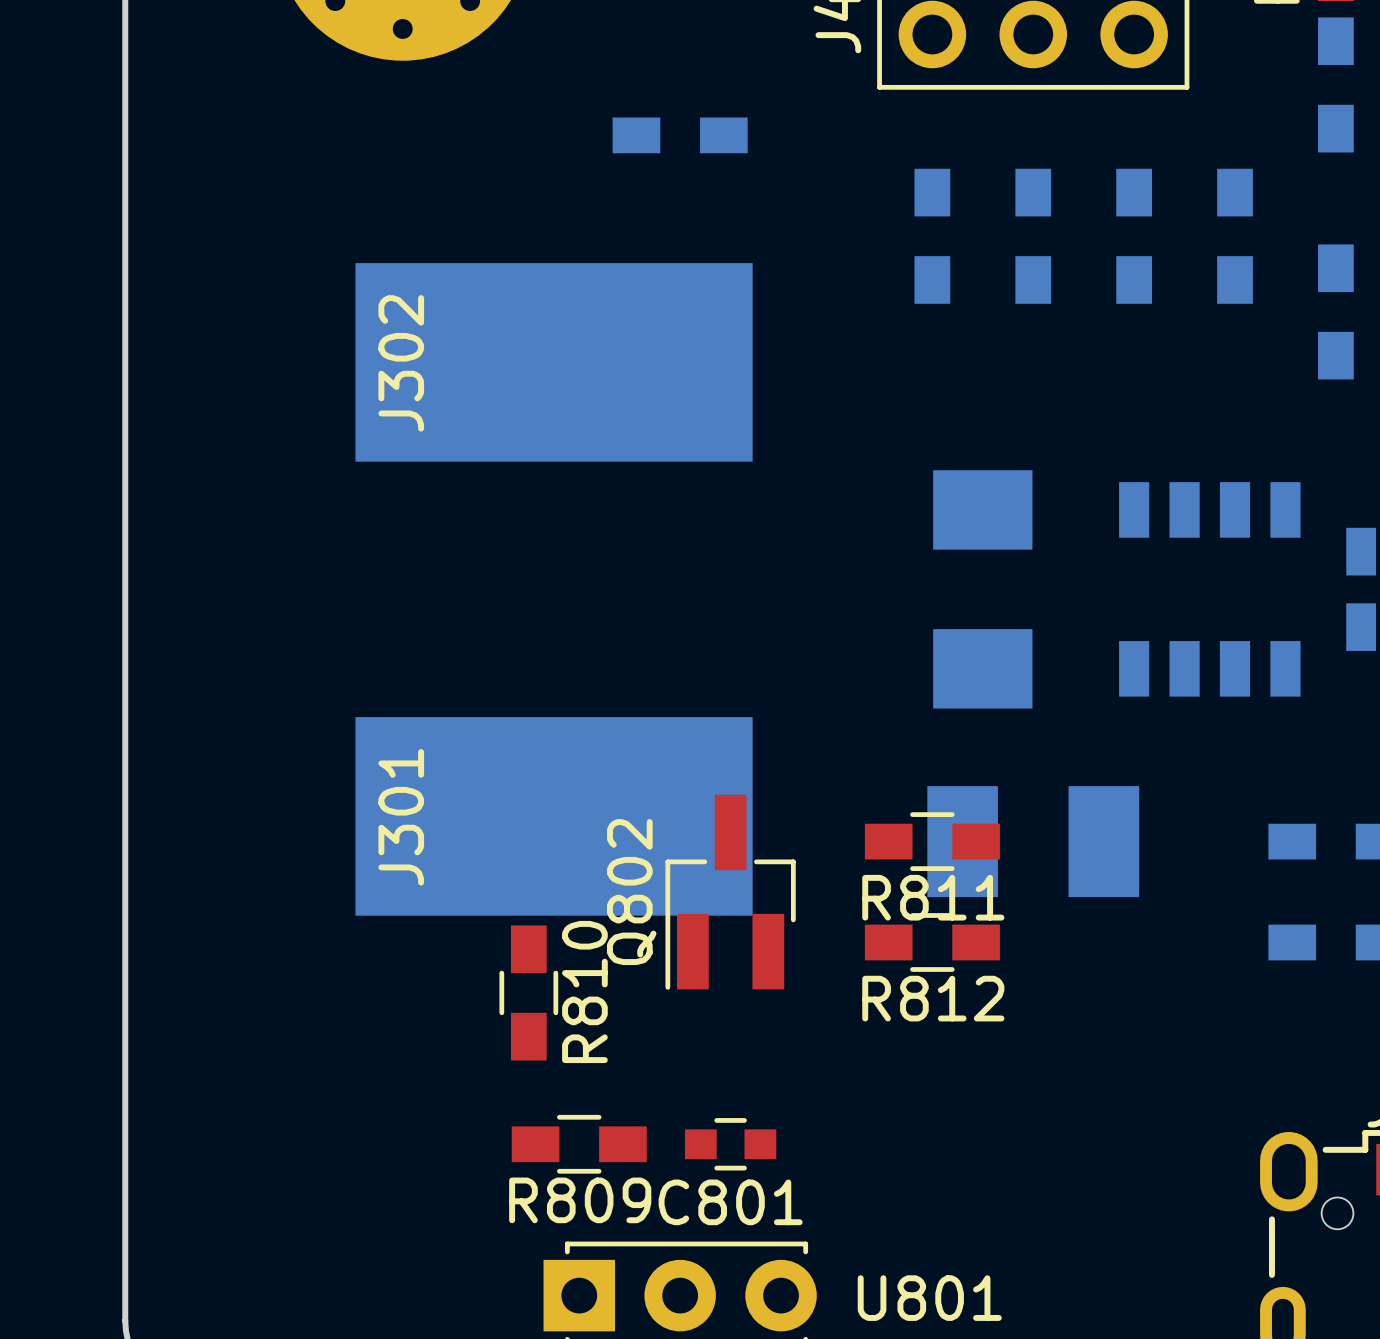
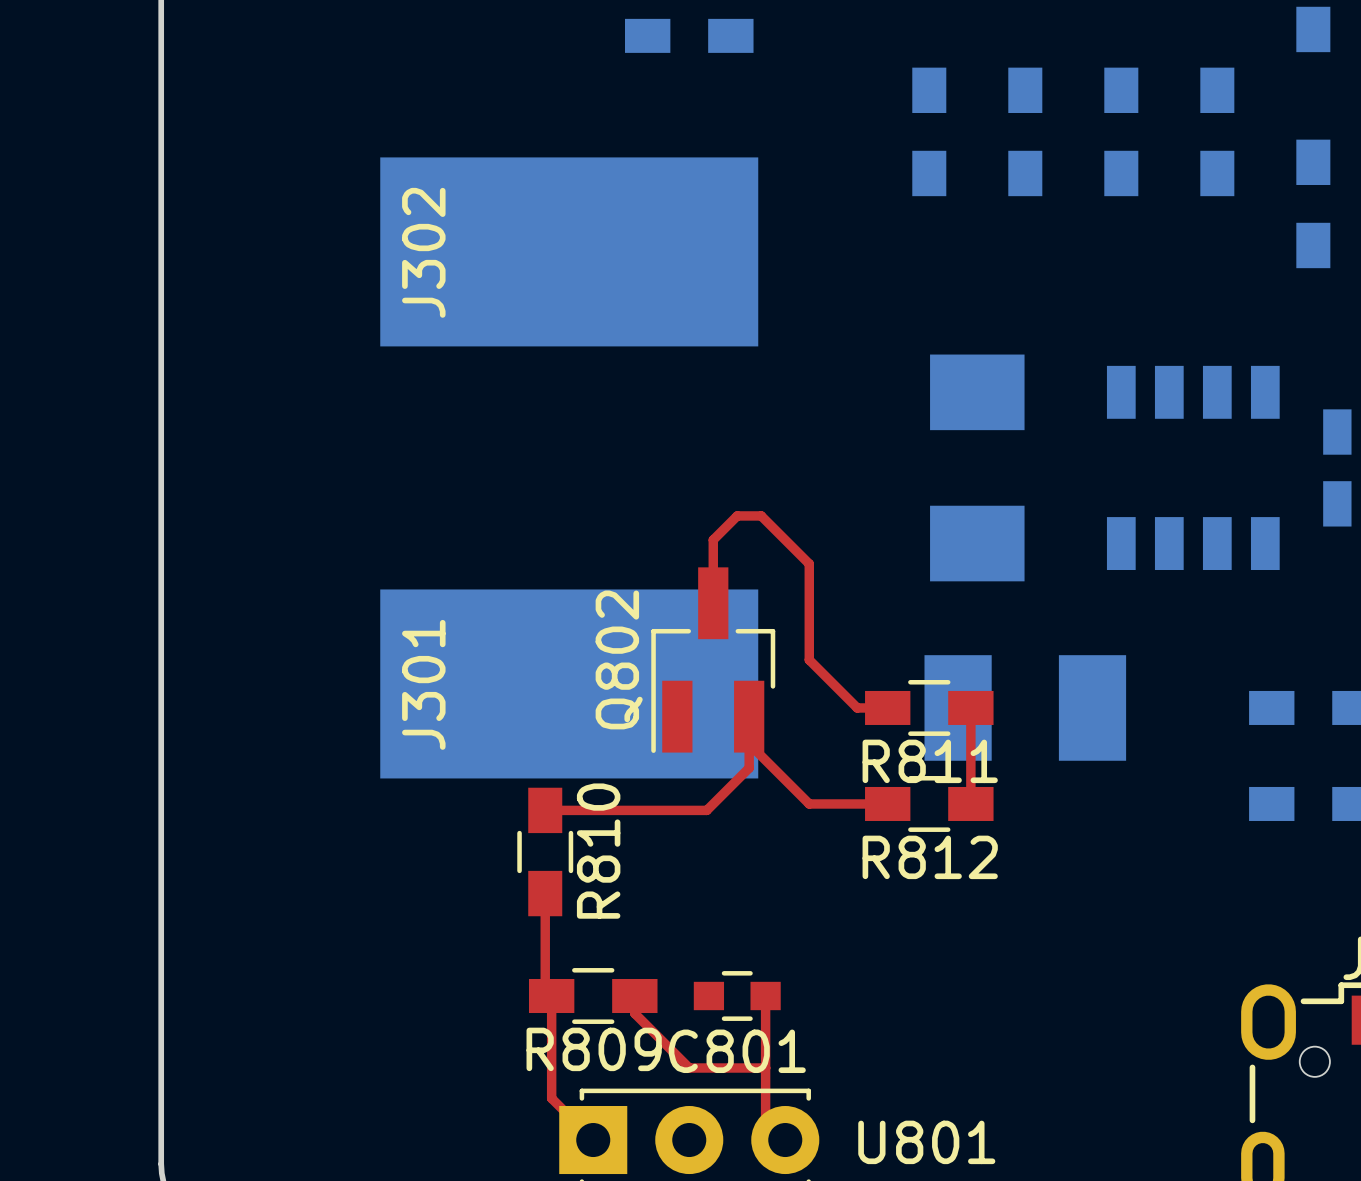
top track: none -> (713, 603) (713, 539) (737, 515) (761, 515) (809, 563) (809, 659) (857, 707) (887, 707)
top track: none -> (970, 707) (970, 803)
top track: none -> (749, 716) (749, 768) (706, 810) (545, 810)
top track: none -> (749, 743) (809, 803) (887, 803)
Q802 position: (730, 892) -> (713, 660)
top track: none -> (545, 893) (545, 989) (551, 996) (551, 1098) (593, 1140)
top track: none -> (634, 996) (634, 1013) (689, 1068) (765, 1068)
top track: none -> (765, 996) (765, 1120) (785, 1140)

